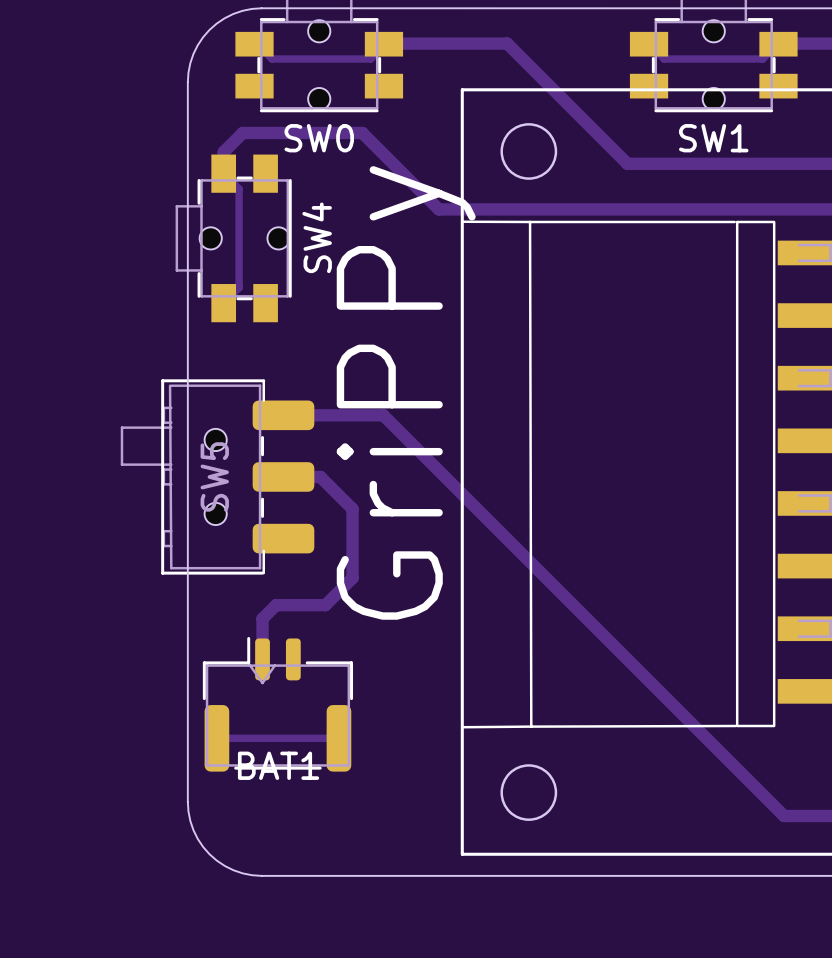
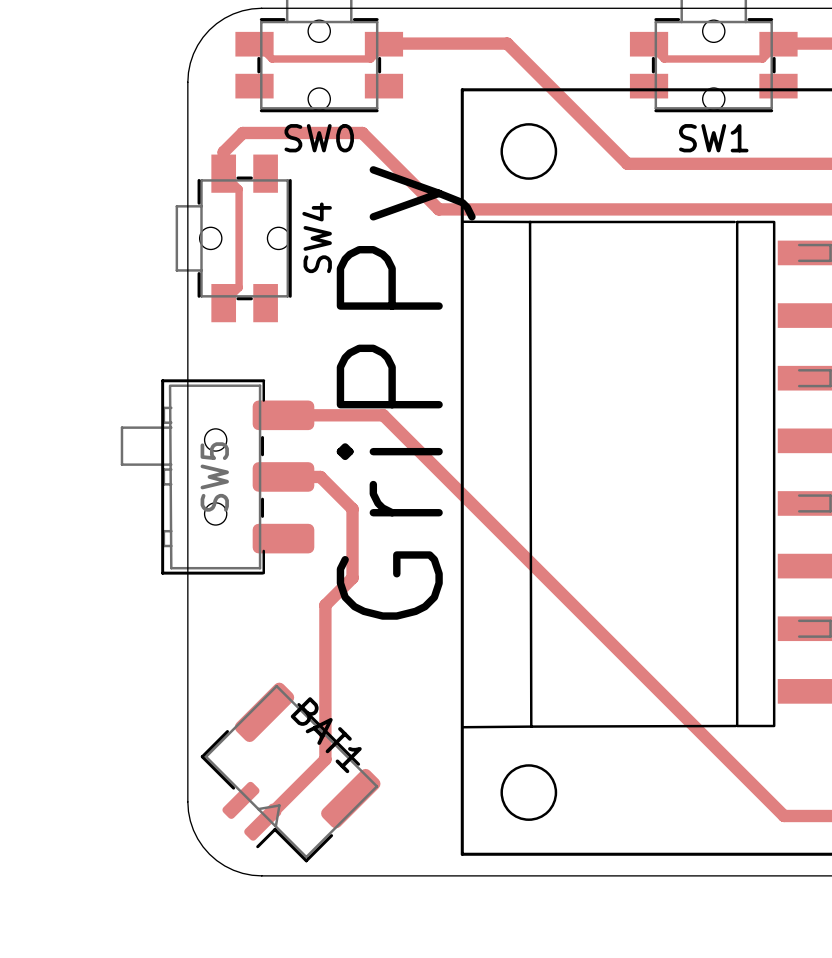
track: (325, 605) (276, 605) (262, 618) (262, 659) -> (325, 605) (325, 759) (262, 822)
BAT1 rotation: 0° (277, 704) -> 135° counterclockwise (290, 772)
track: (216, 738) (338, 738) -> none

